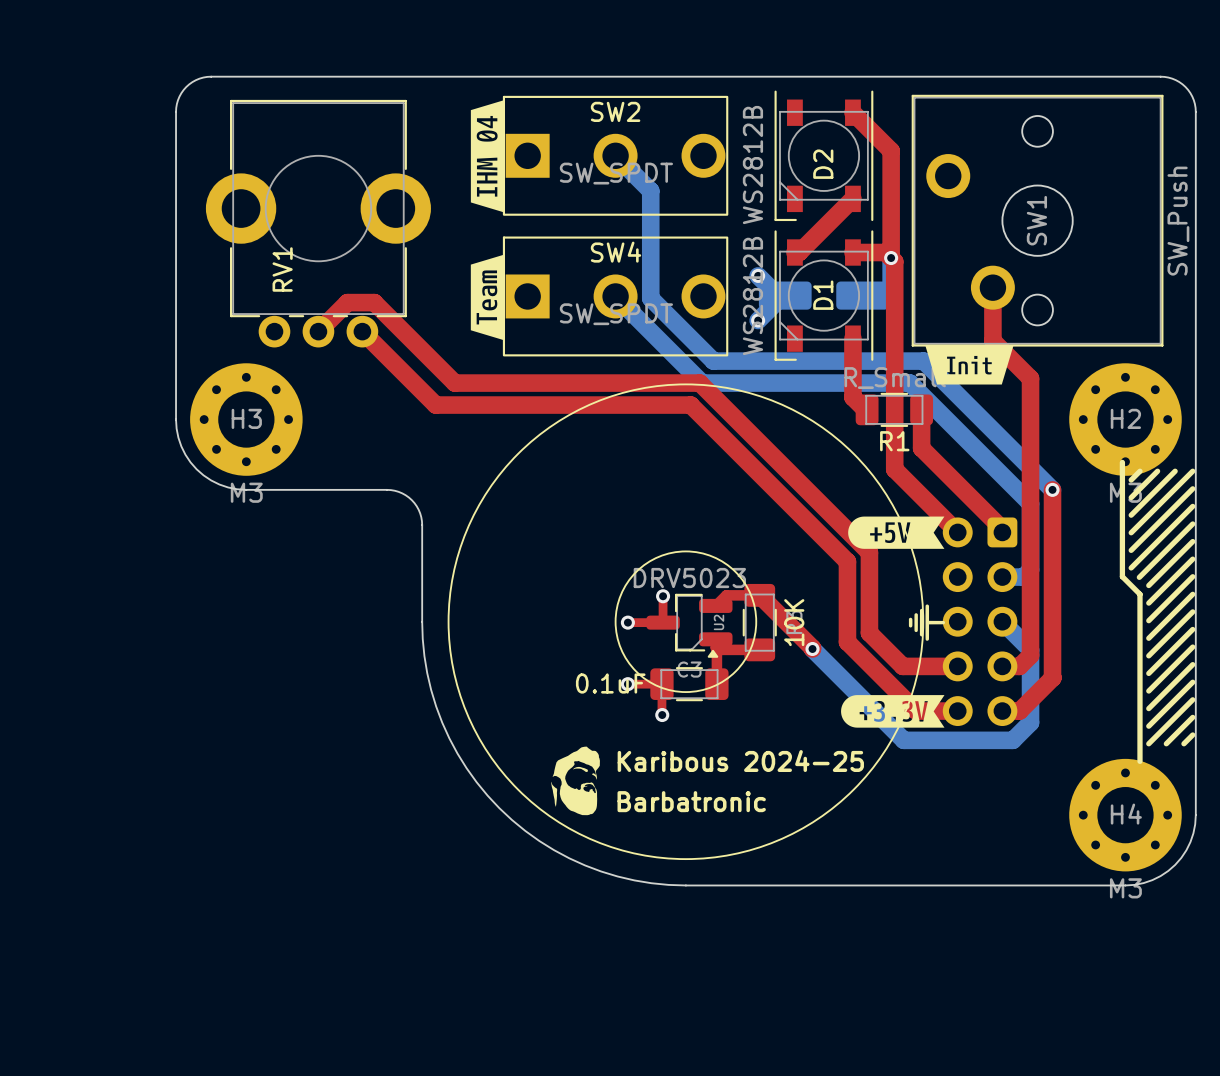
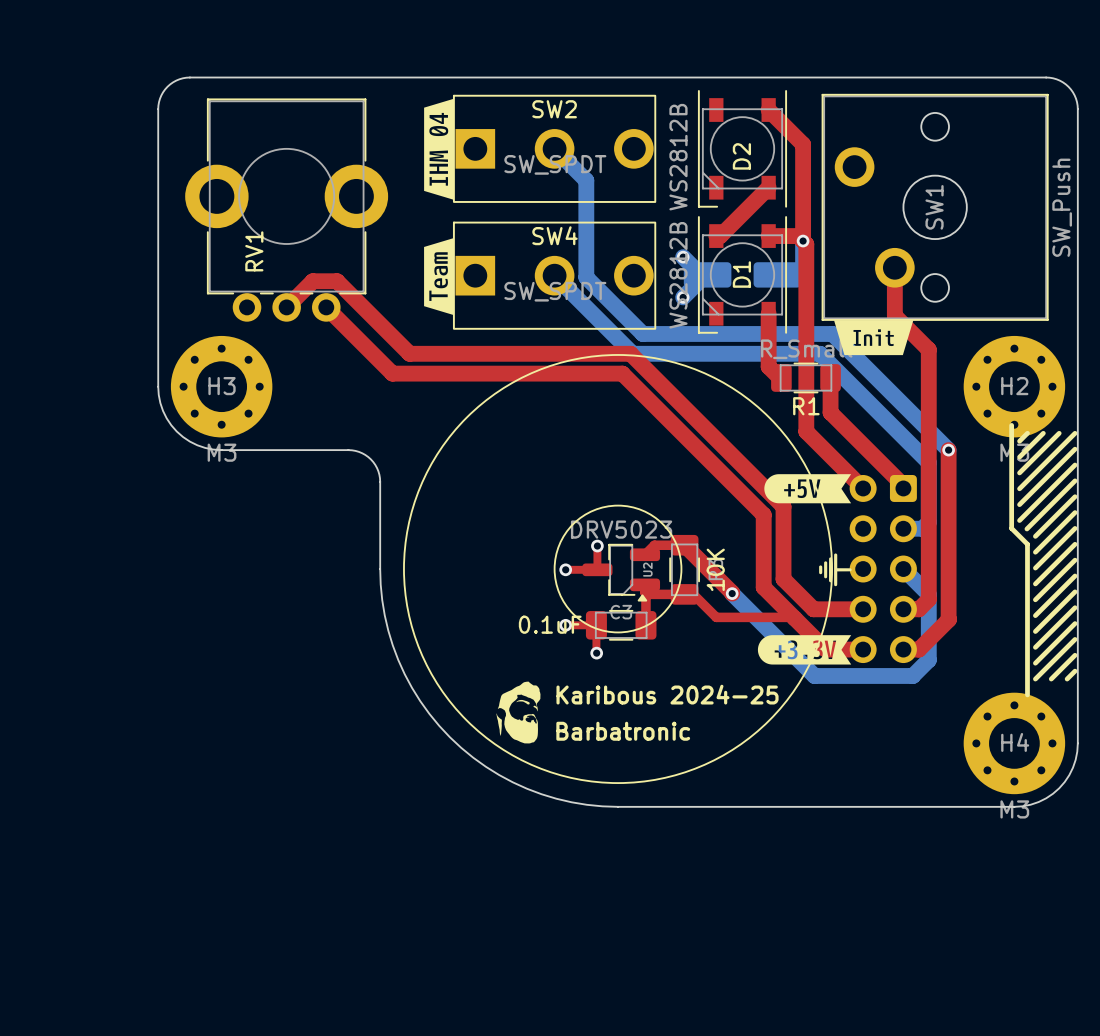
top track: none -> (684, 594) (693, 594) (716, 617) (794, 618)

